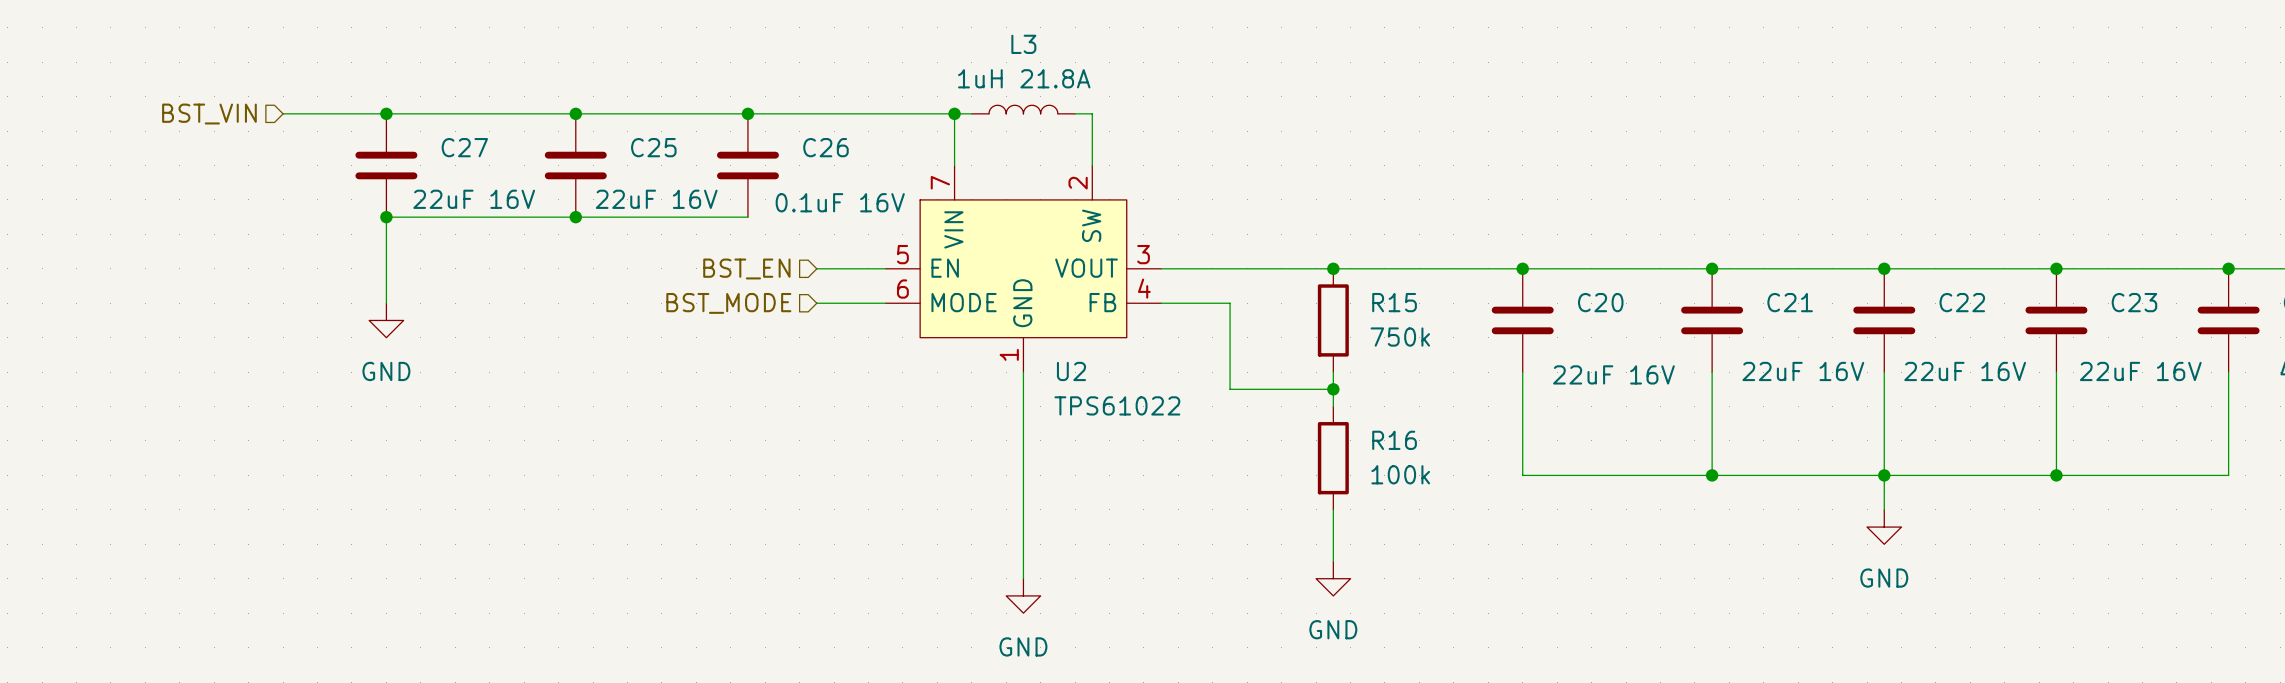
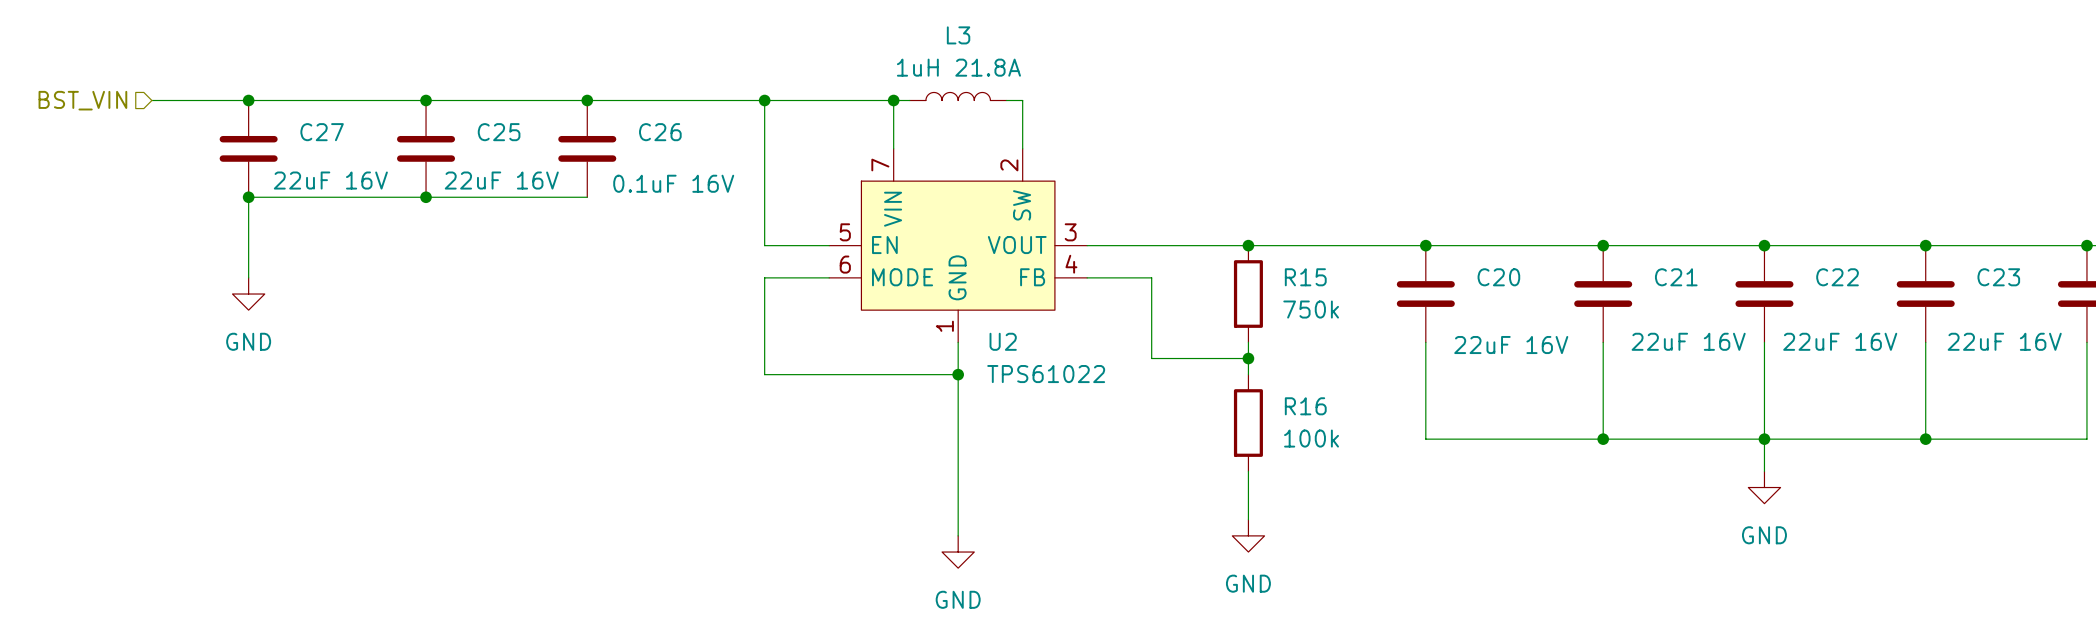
wire: none -> (151, 100) (264, 100)
junction: none -> (248, 100)
junction: (386, 113) -> none
junction: none -> (426, 100)
junction position: (575, 113) -> (587, 100)
junction: (747, 113) -> none
wire: none -> (764, 100) (764, 245)
junction: none -> (764, 100)
hierarchical label position: BST_VIN (209, 114) -> BST_VIN (82, 100)
C27 position: (386, 165) -> (248, 148)
C25 position: (575, 165) -> (426, 148)
C26 position: (747, 165) -> (587, 148)
junction: none -> (248, 197)
wire: (386, 217) (386, 303) -> (361, 197) (248, 197) (248, 277)
junction: (386, 217) -> none
junction: none -> (426, 197)
junction: (575, 217) -> none
wire: (627, 217) (747, 217) -> none
hierarchical label: BST_EN (746, 268) -> none
hierarchical label: BST_MODE (728, 303) -> none
wire: none -> (764, 277) (764, 374) (958, 374)
power symbol position: GND (386, 320) -> GND (248, 294)
junction: none -> (958, 374)

